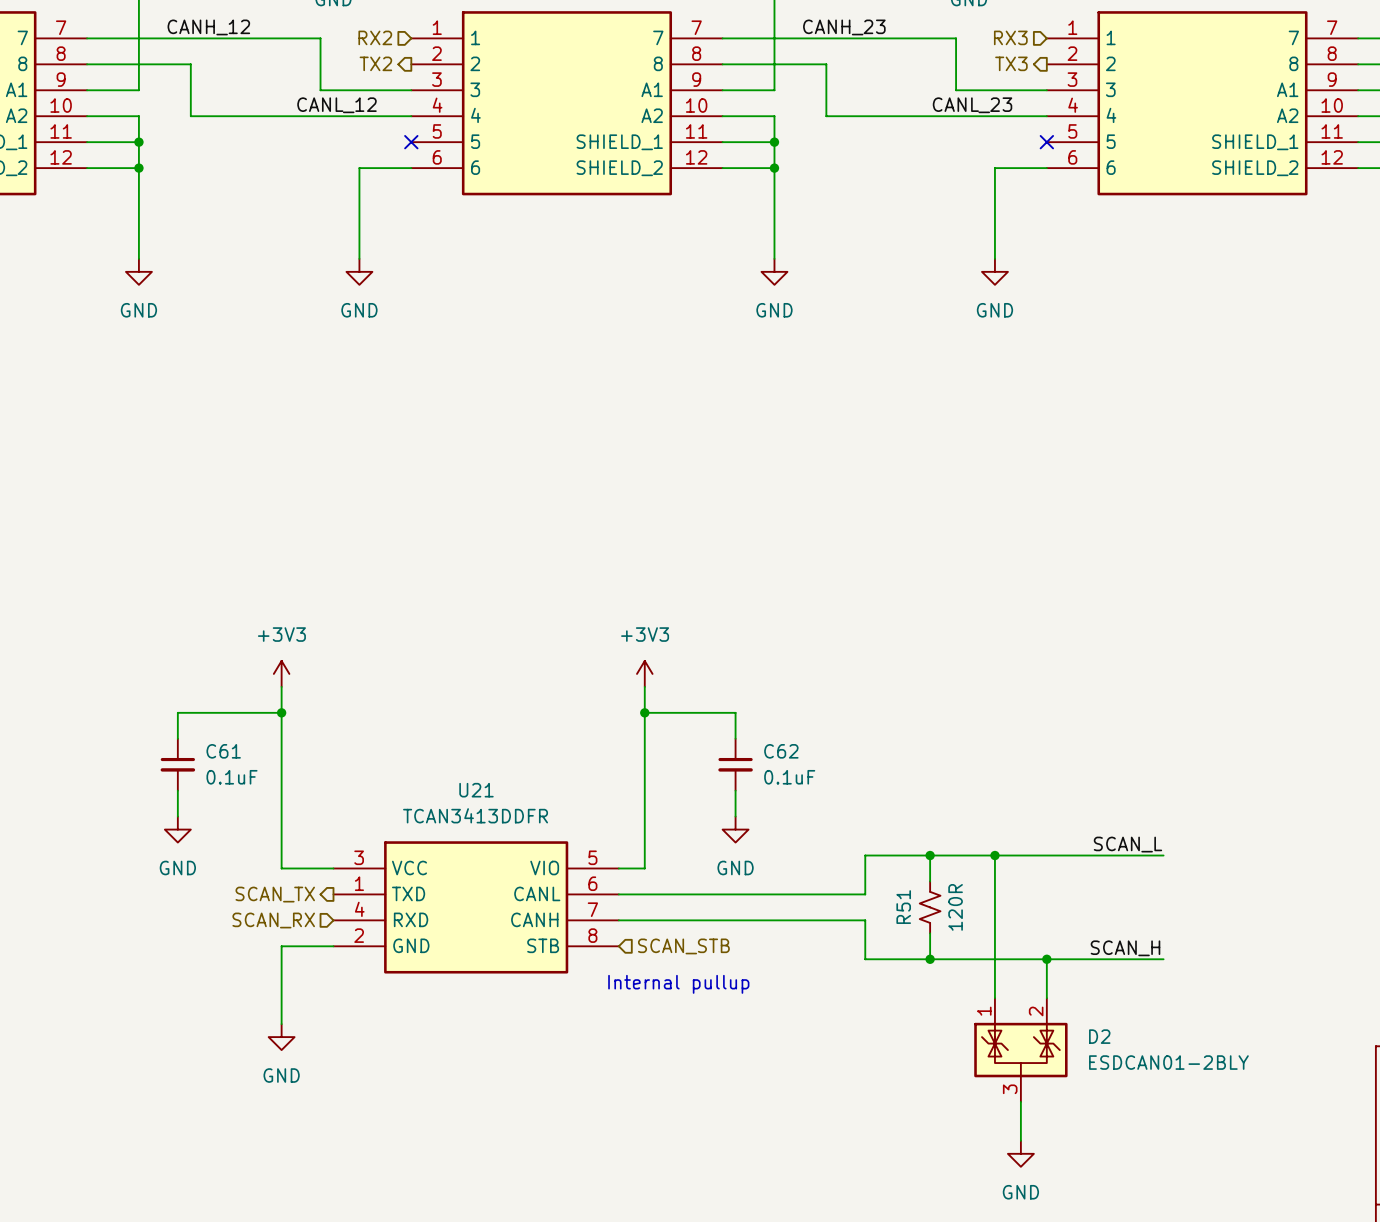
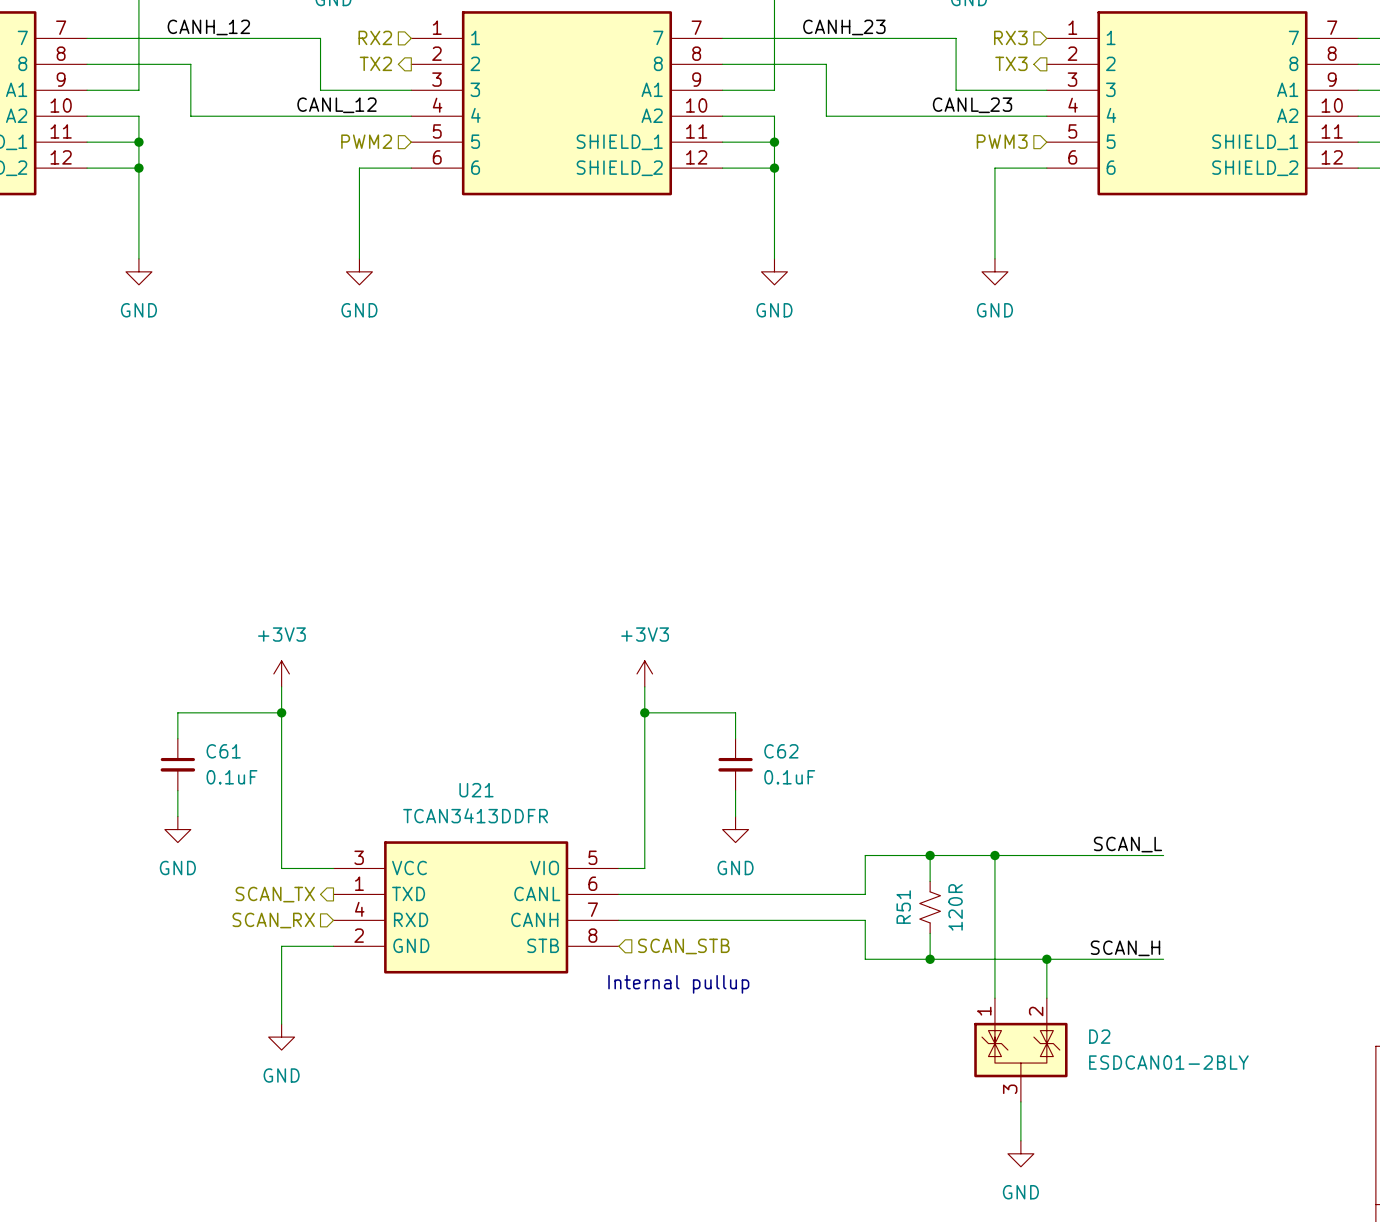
hierarchical label: none -> PWM2 (366, 141)
hierarchical label: none -> PWM3 (1002, 141)
no-connect mark: (411, 142) -> none
no-connect mark: (1046, 142) -> none

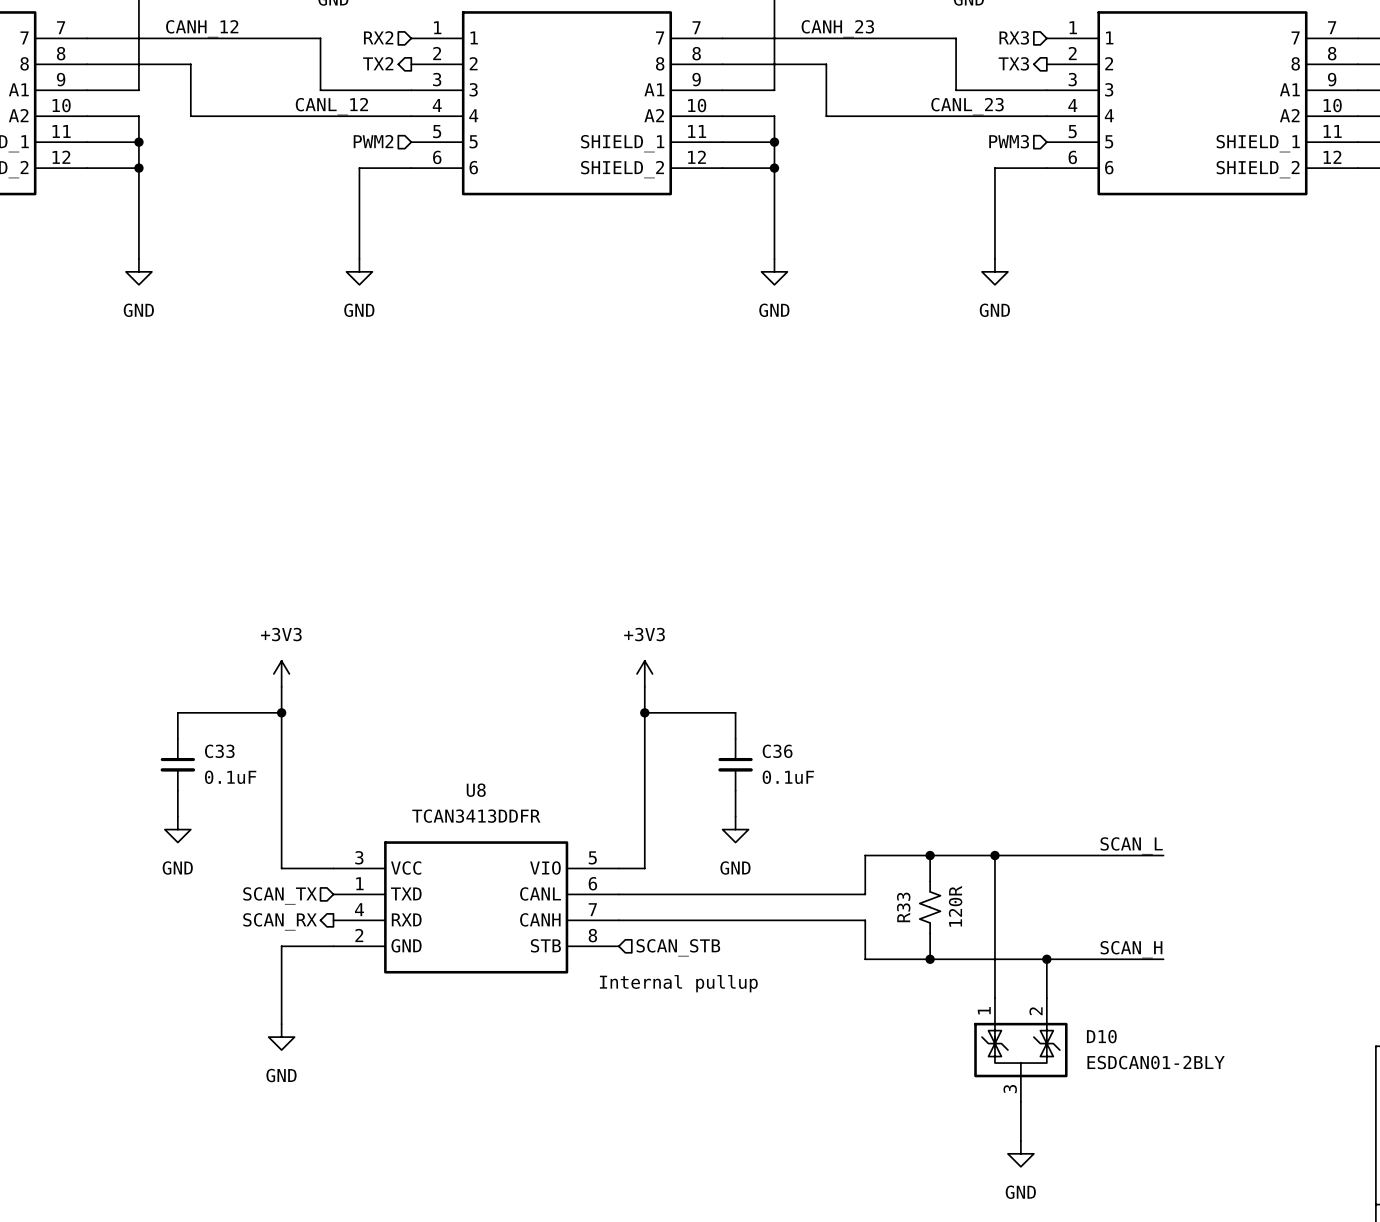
C61 name: C61 (223, 751) -> C33 (219, 751)
C62 name: C62 (781, 751) -> C36 (777, 751)
U21 name: U21 (476, 790) -> U8 (476, 790)
hierarchical label shape: output (275, 894) -> input (280, 895)
R51 name: R51 (903, 907) -> R33 (903, 907)
hierarchical label shape: input (273, 920) -> output (280, 921)
D2 name: D2 (1099, 1036) -> D10 (1101, 1036)

